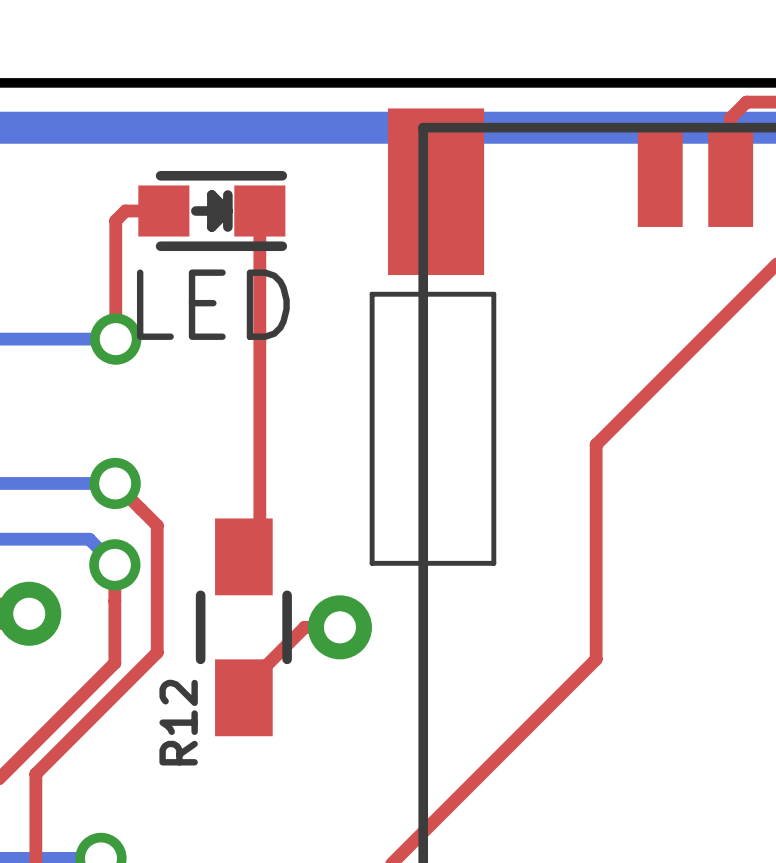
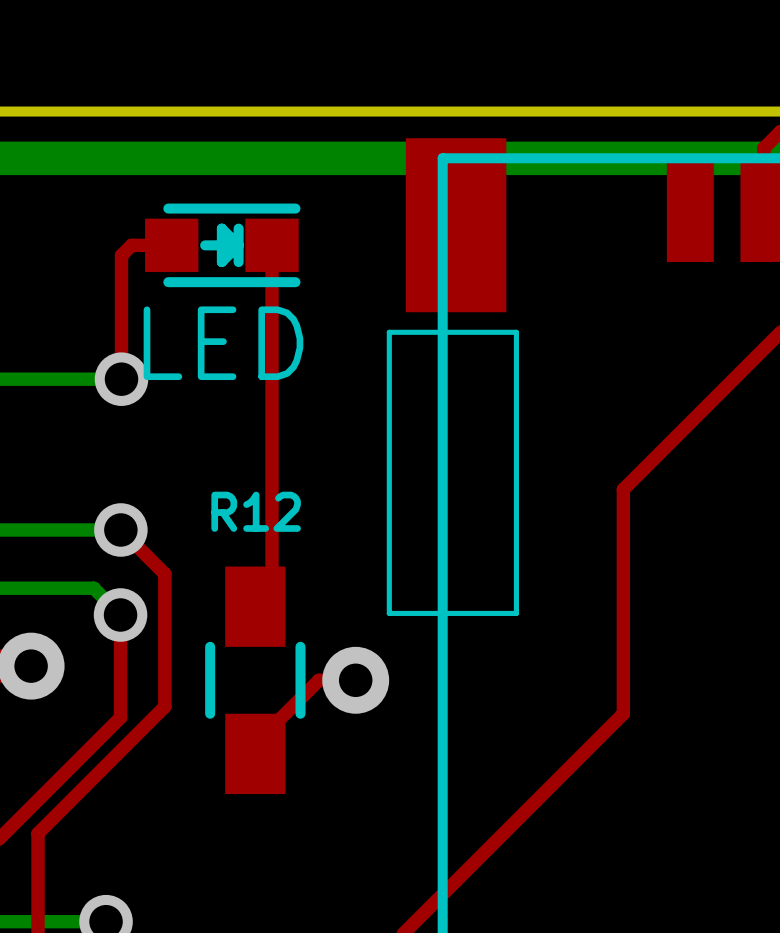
R12 name rotation: 0° (178, 722) -> 90° clockwise (256, 511)
R12 name position: R12 (178, 722) -> R12 (256, 511)

